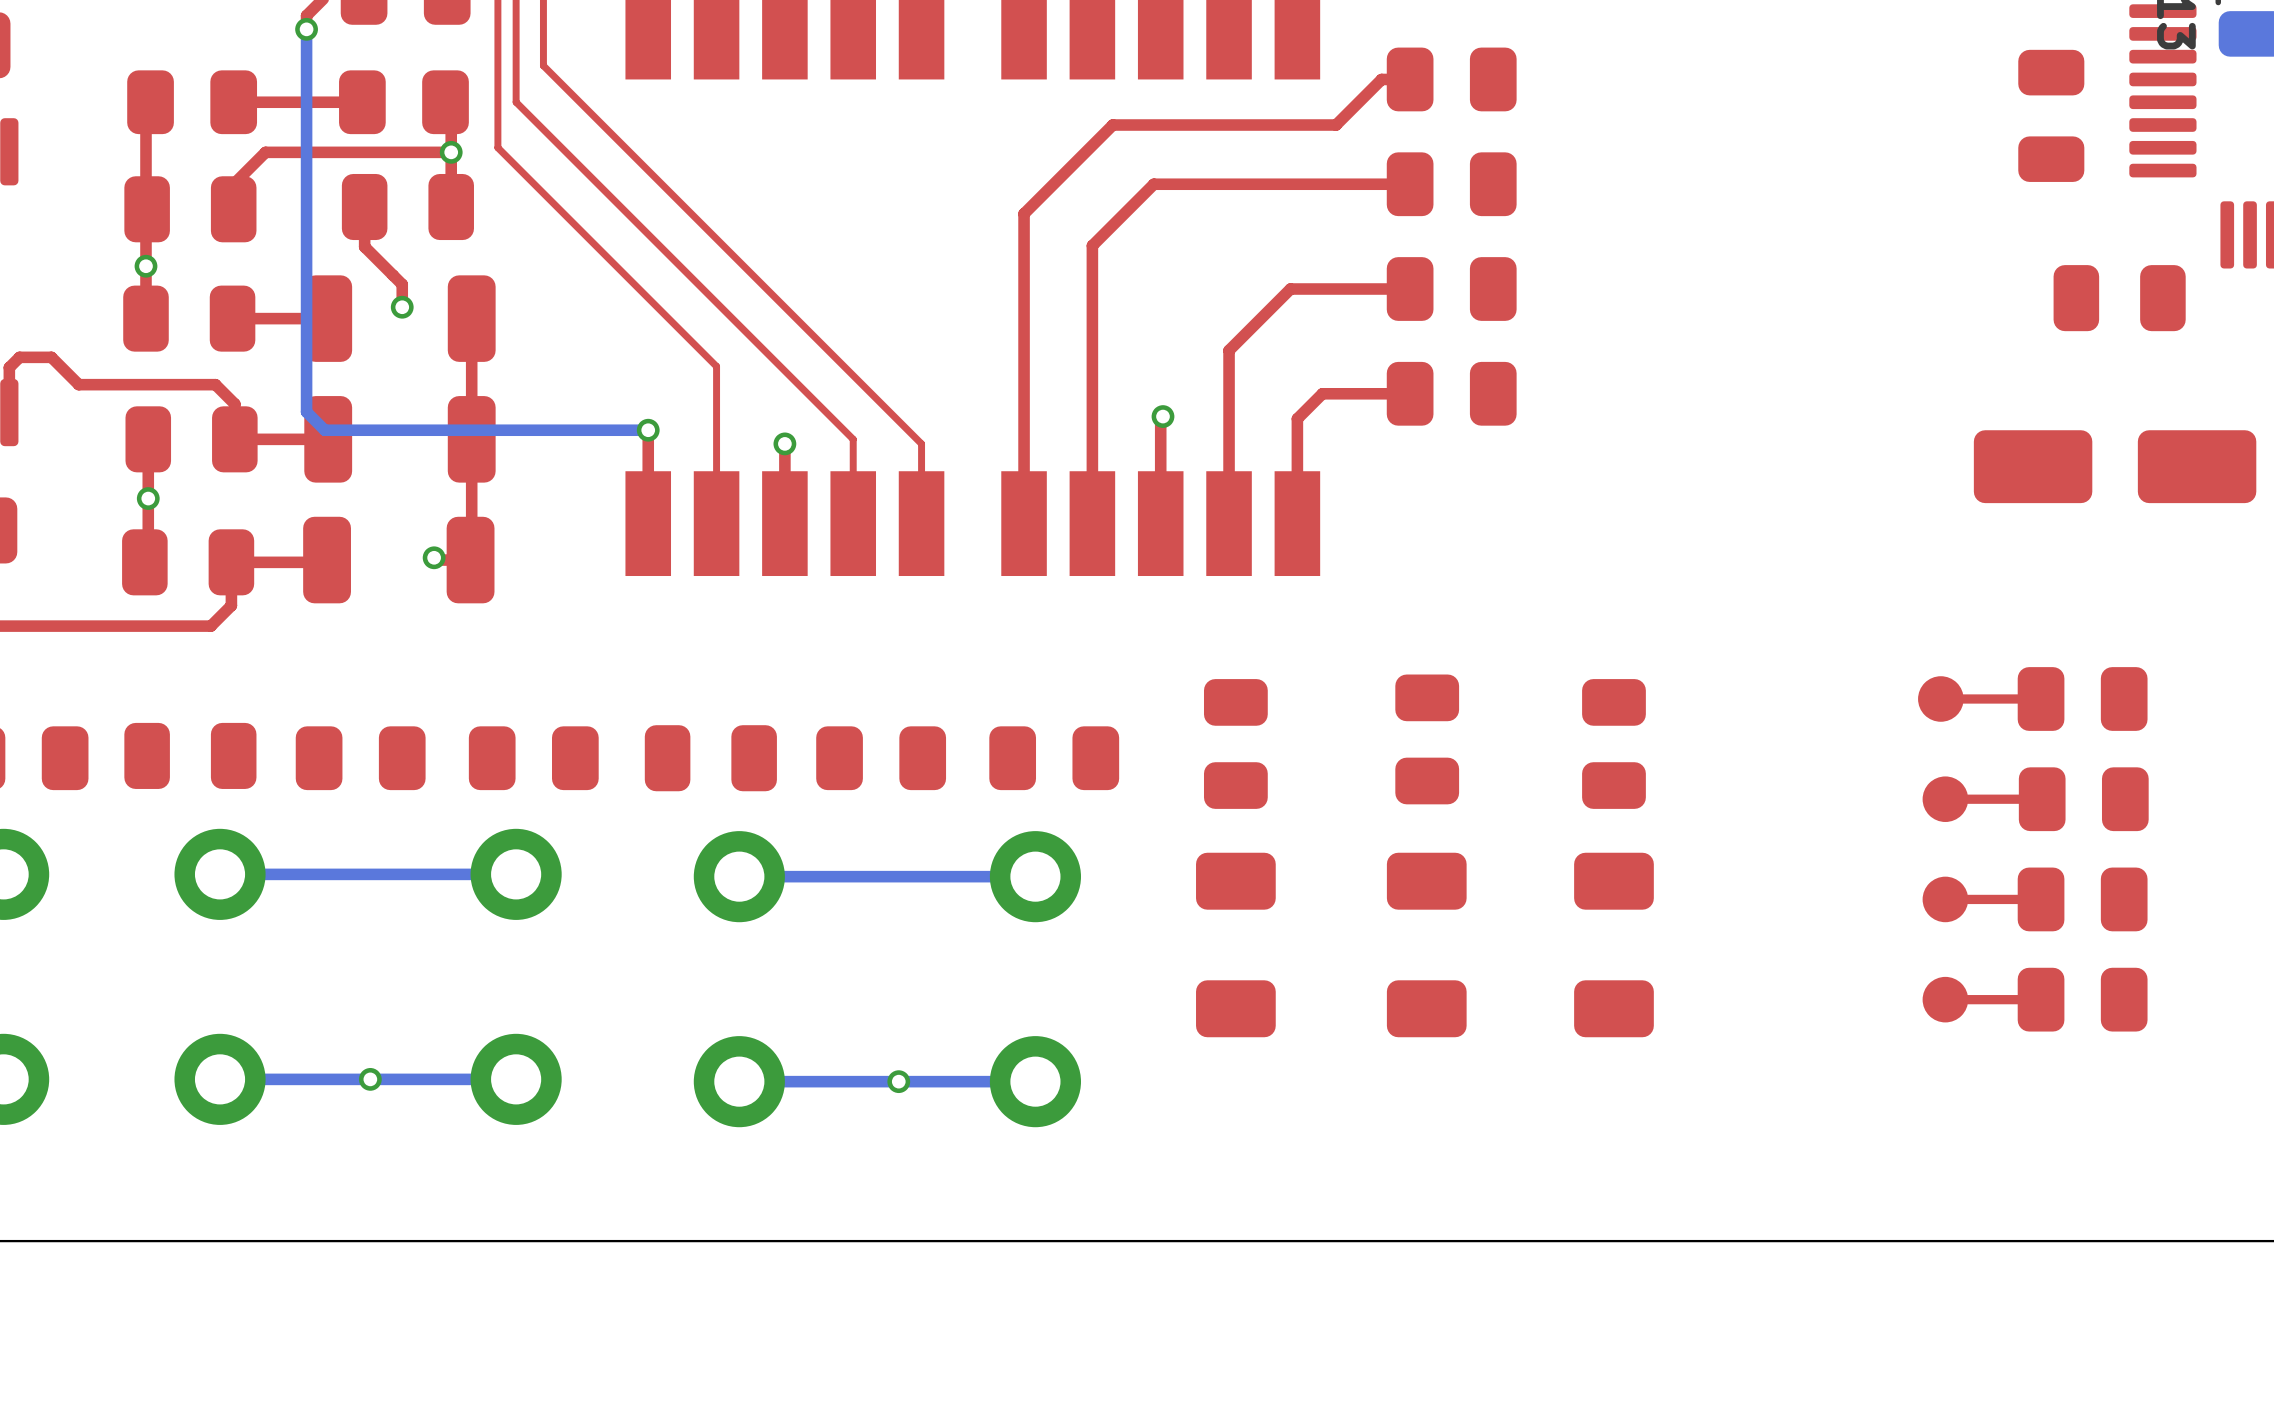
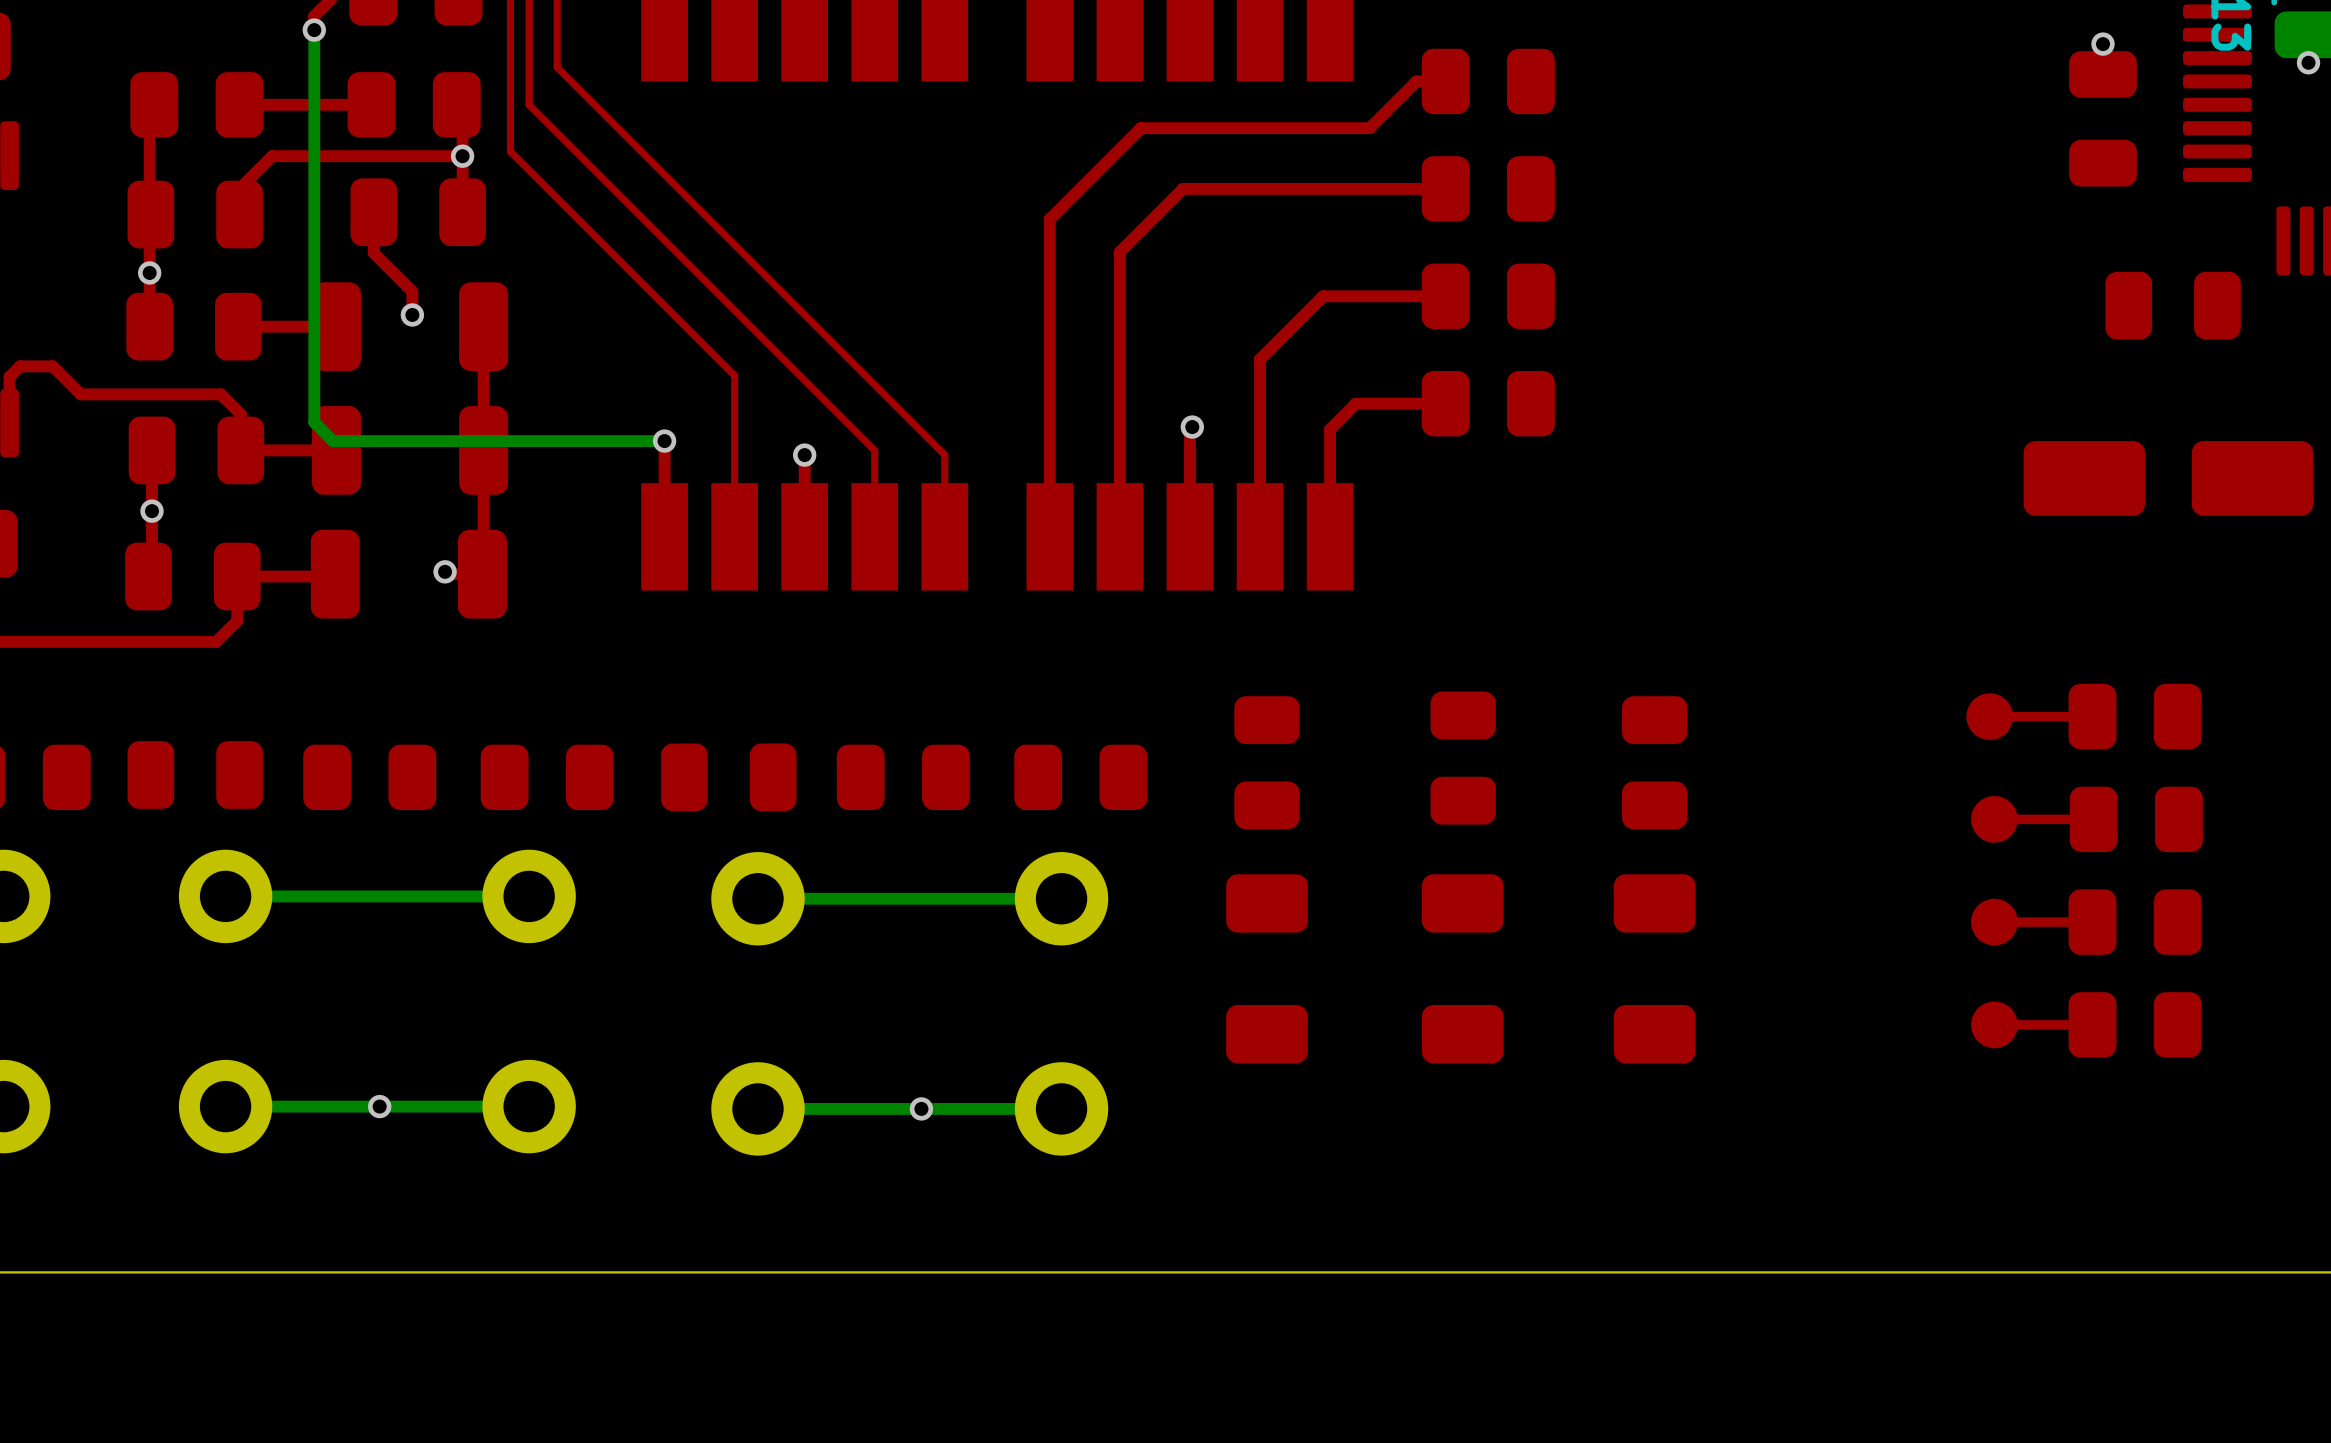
via: none -> (2103, 44)
via: none -> (2308, 62)

